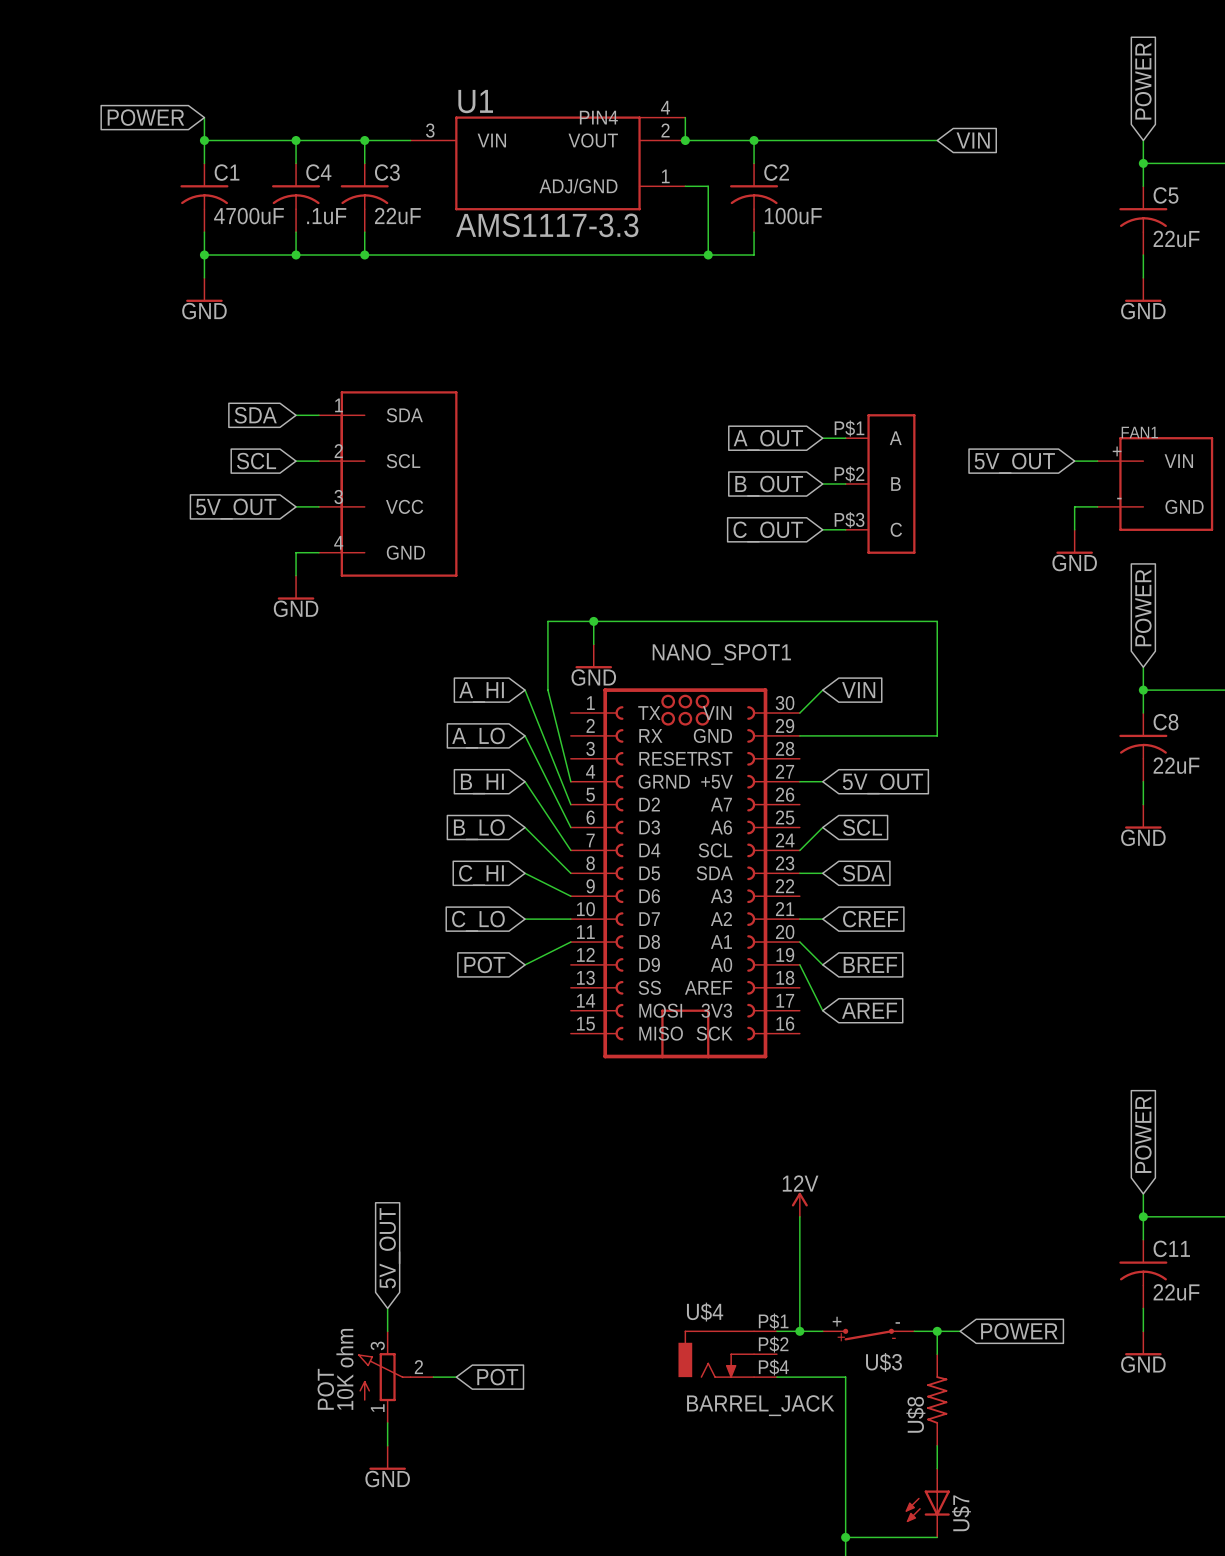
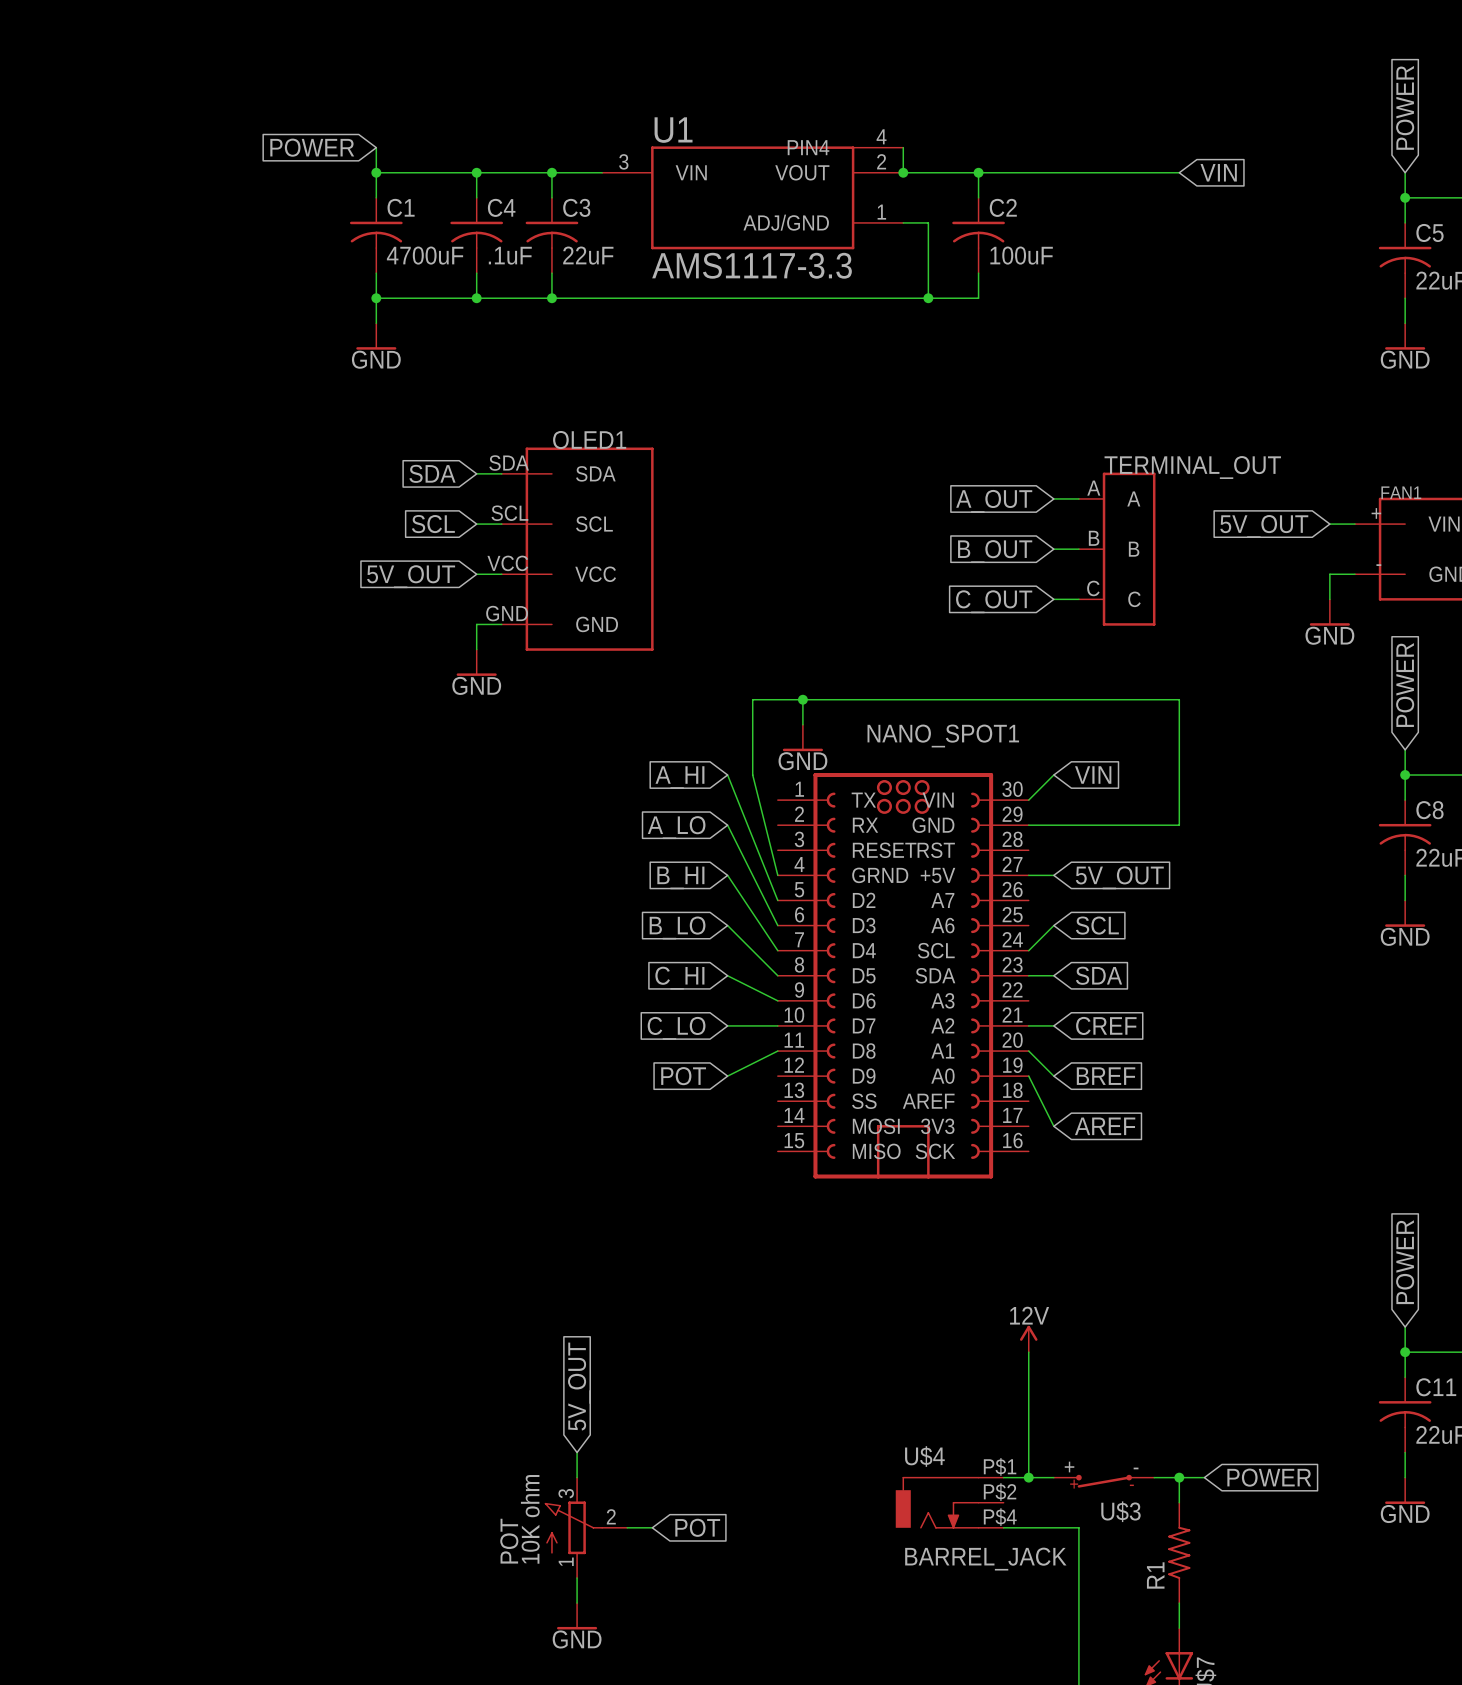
TERMINAL_OUT name: none -> TERMINAL_OUT (1192, 467)
TERMINAL_OUT pin number: P$1 (849, 428) -> A (1093, 488)
TERMINAL_OUT pin number: P$2 (849, 474) -> B (1094, 538)
part: (388, 484) -> none
OLED1: none -> (577, 549)
TERMINAL_OUT pin number: P$3 (849, 520) -> C (1093, 588)
U$8 name: U$8 (915, 1414) -> R1 (1155, 1575)

